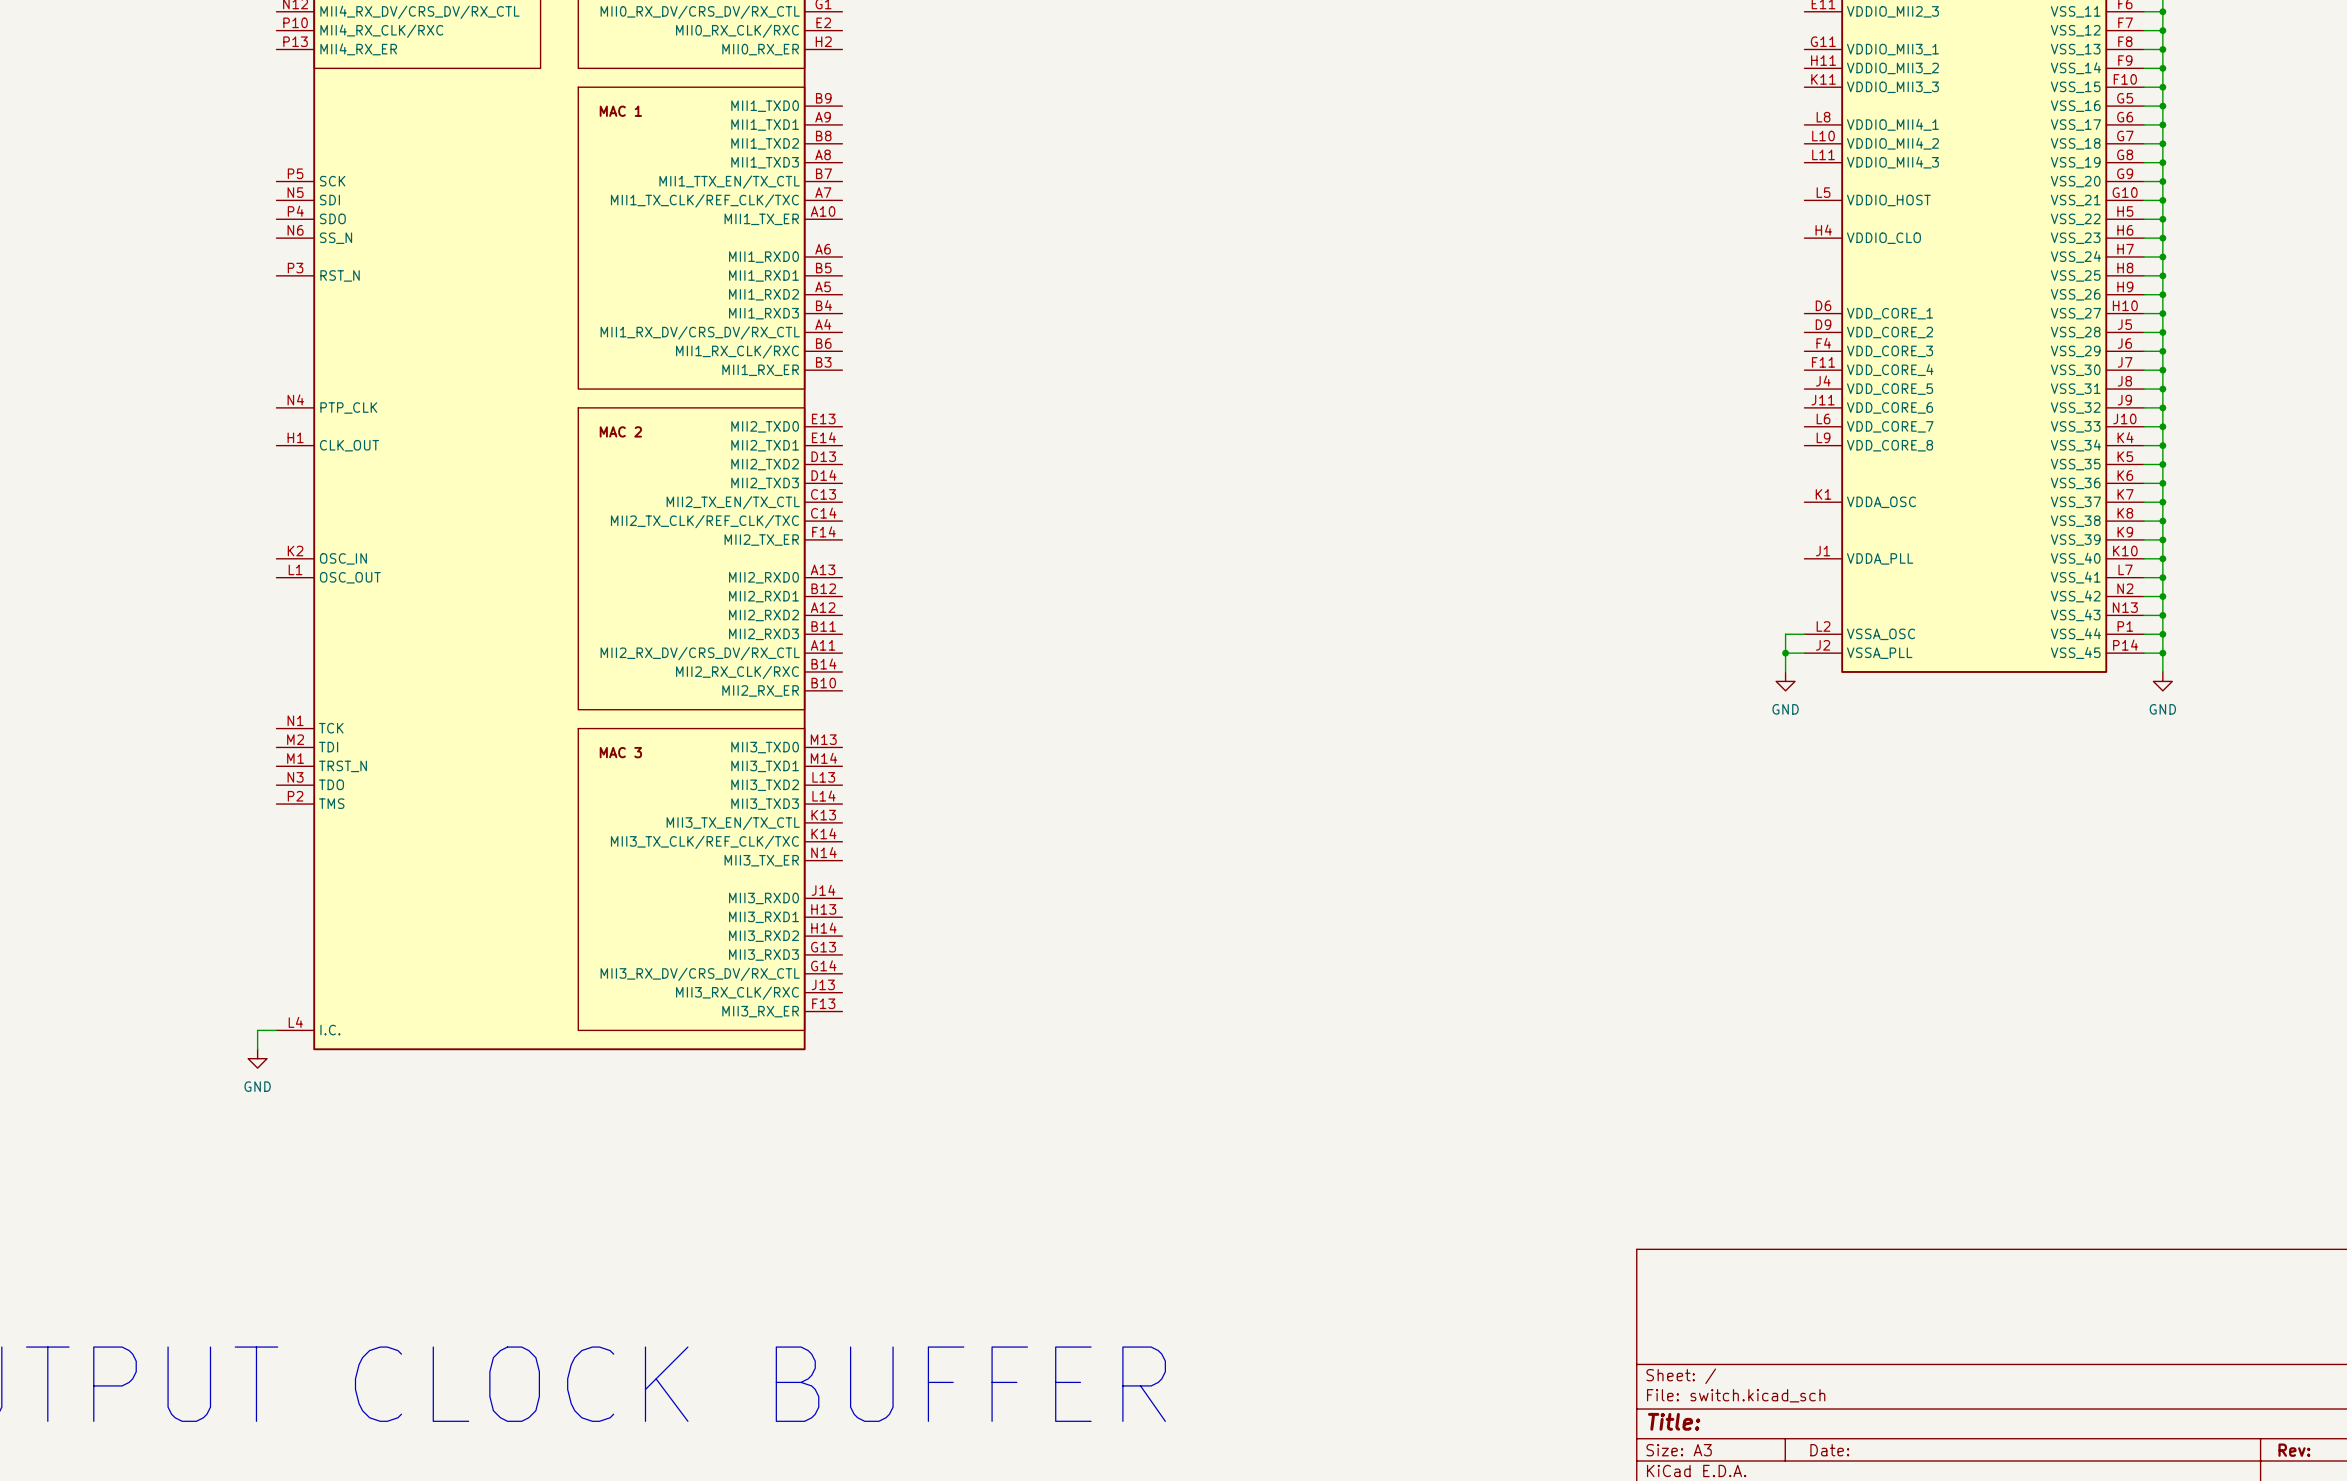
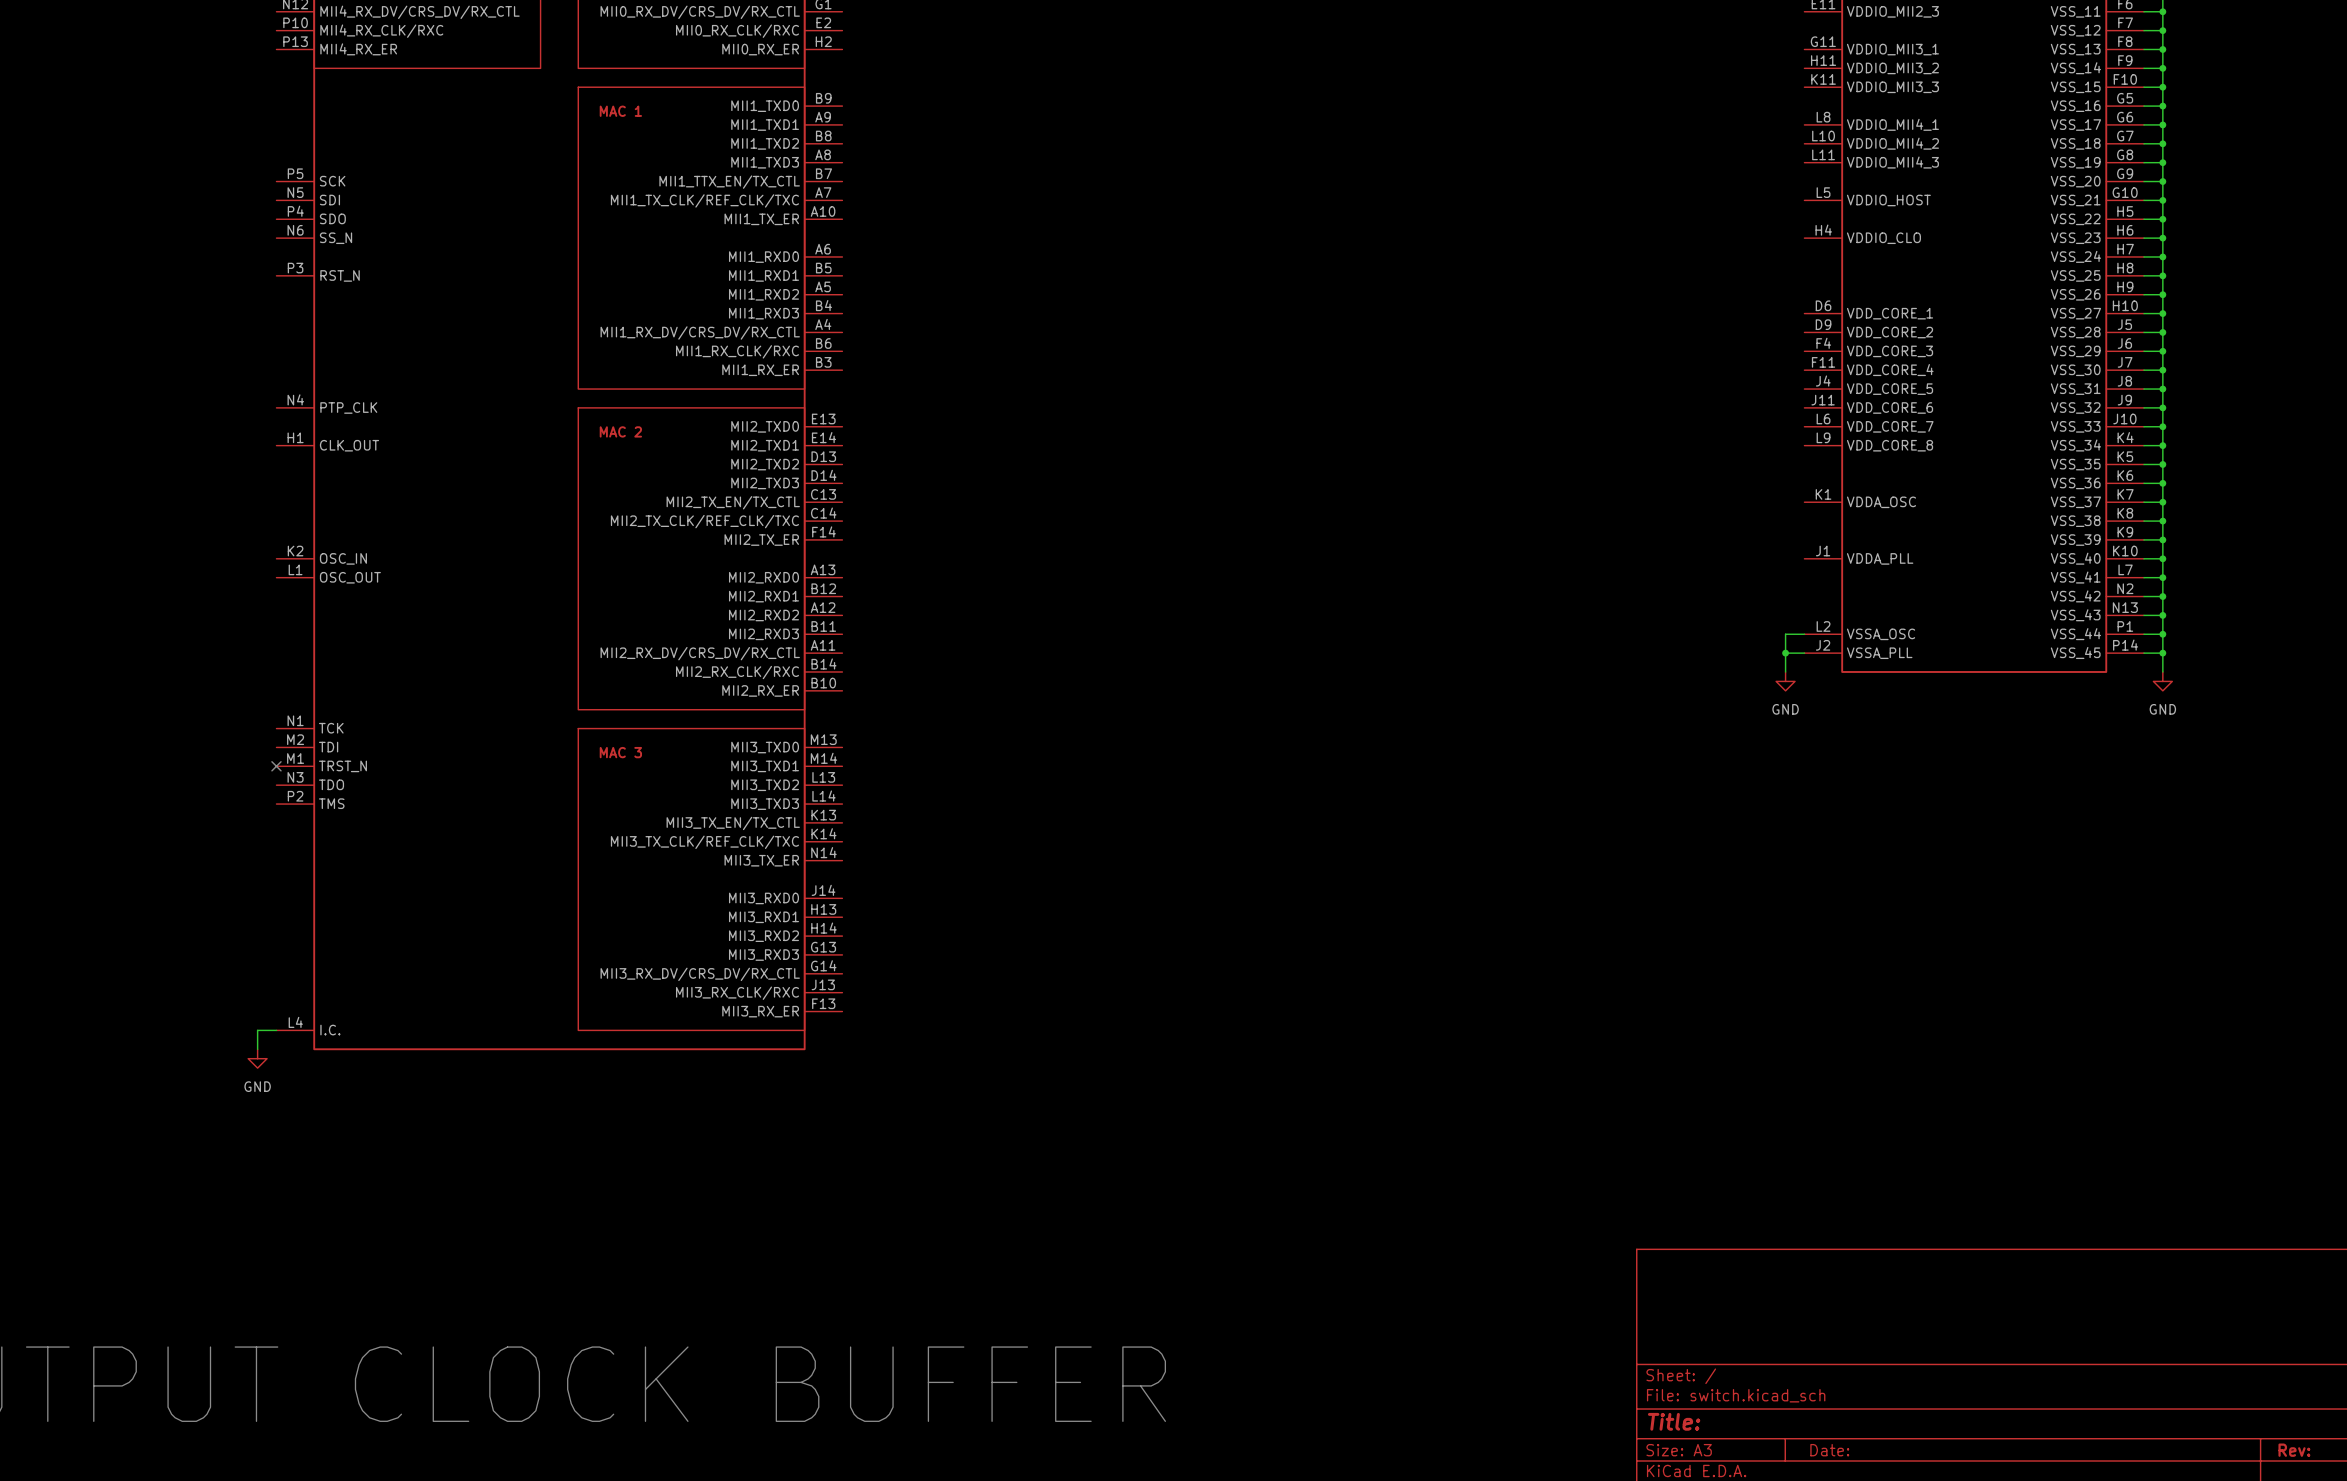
no-connect mark: none -> (276, 766)

